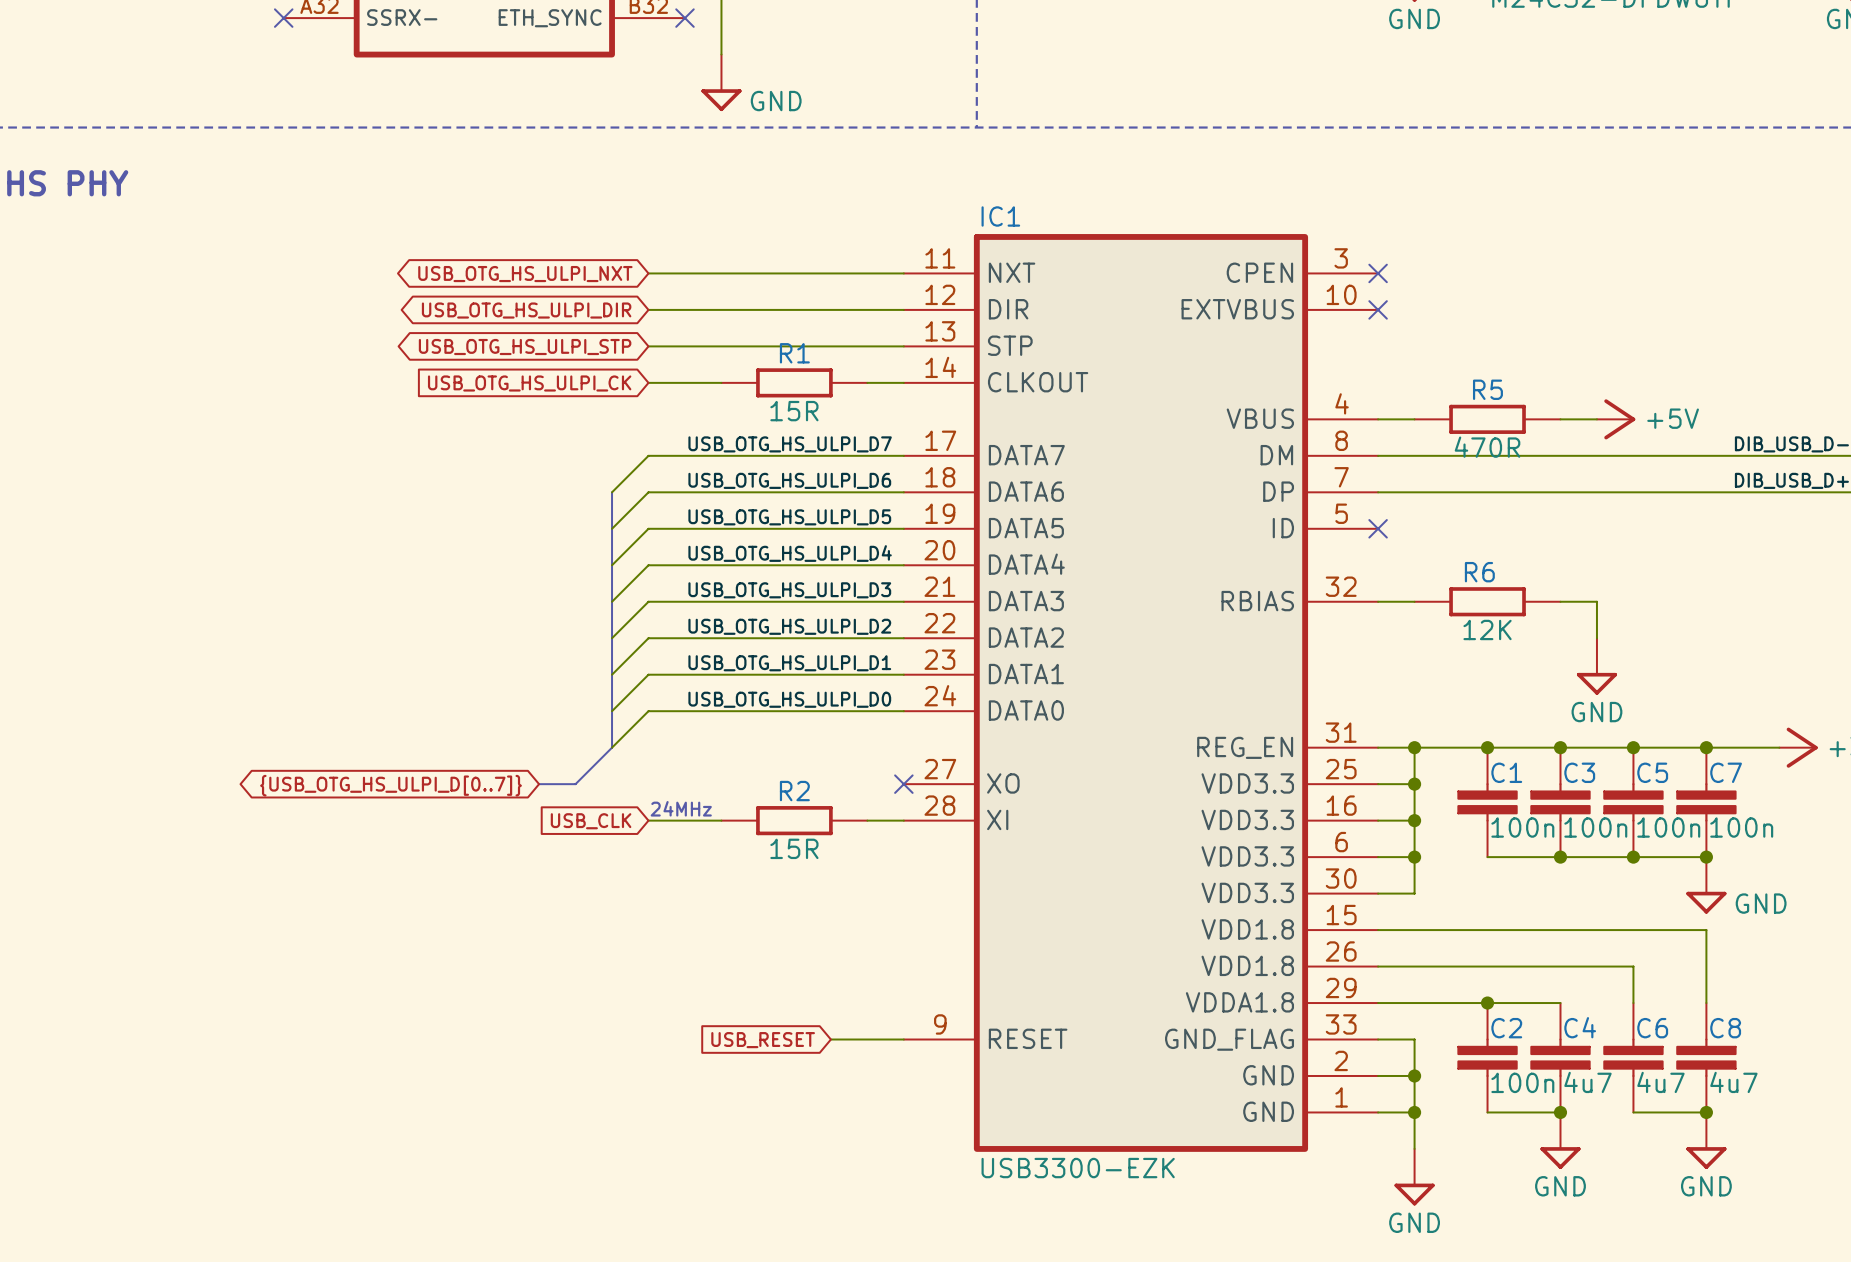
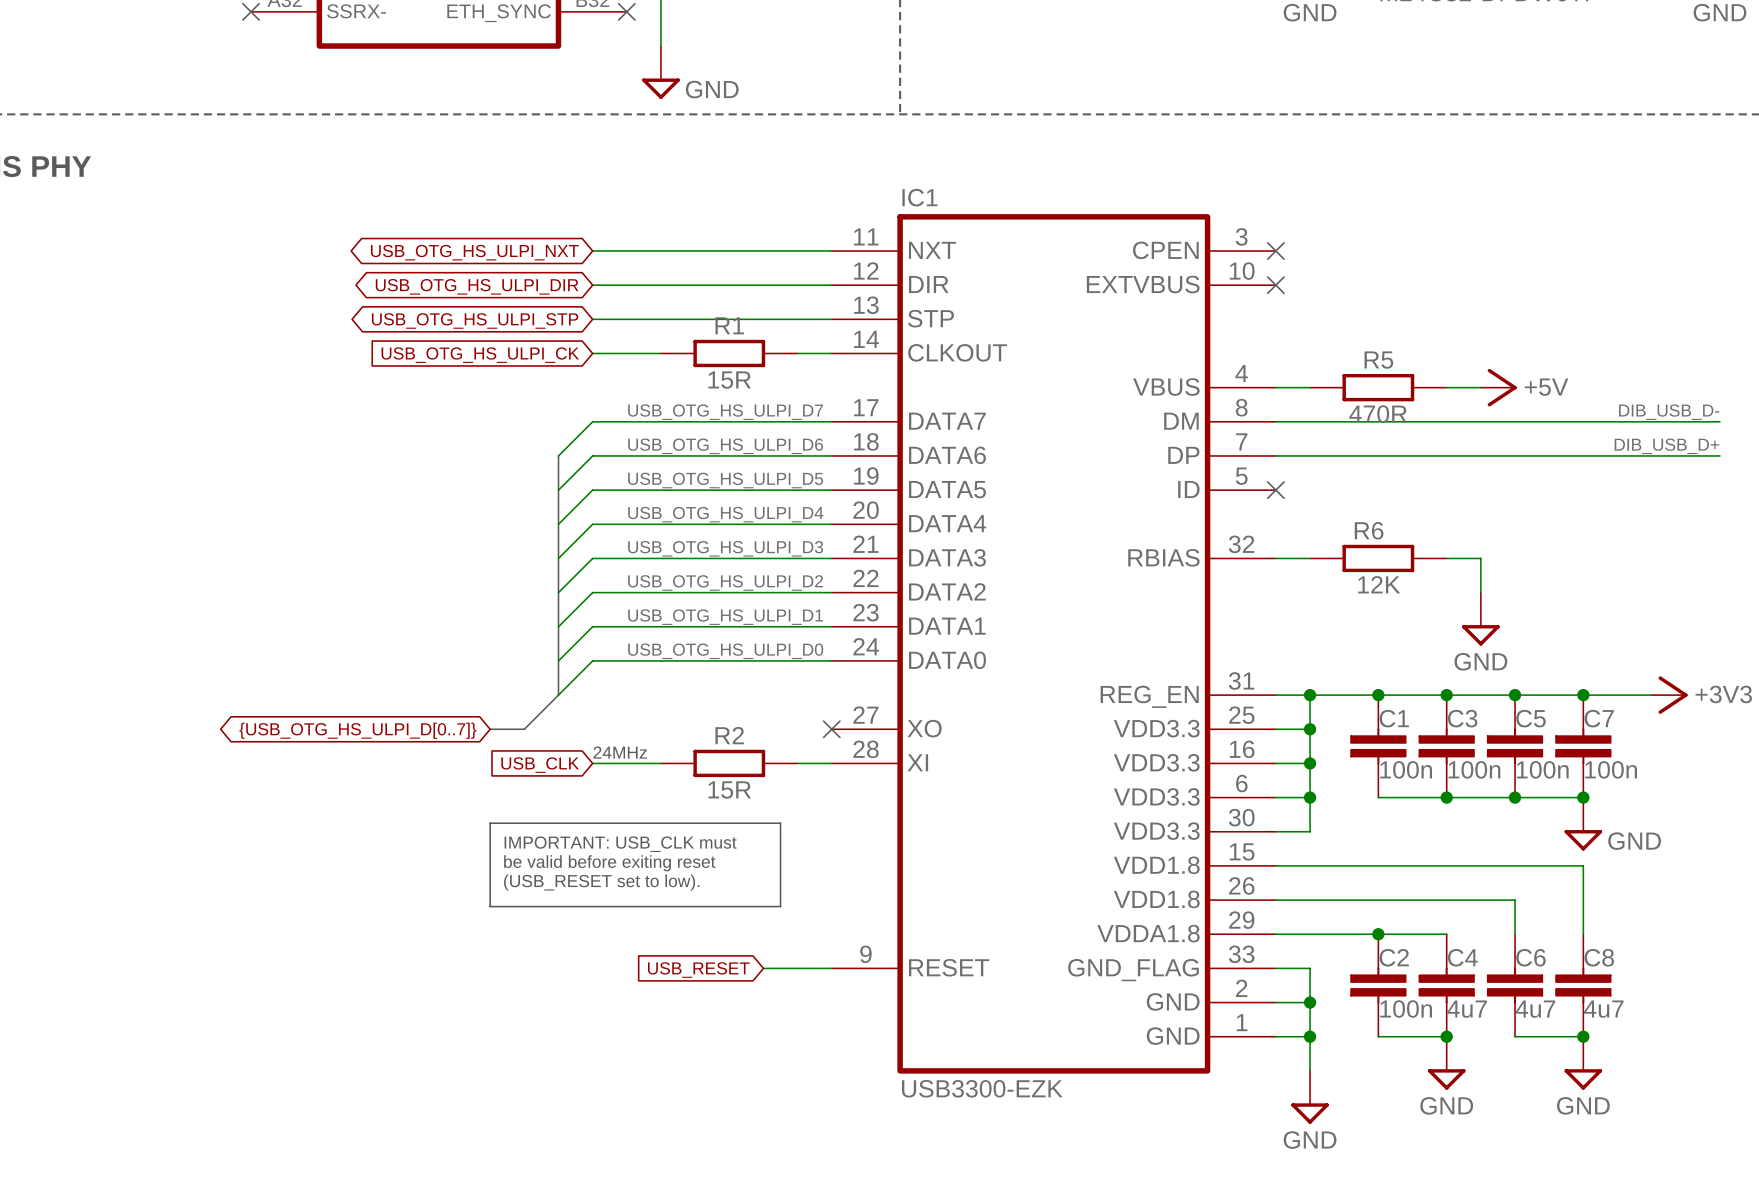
line: none -> (490, 823) (780, 823) (780, 906) (490, 906) (490, 823)
text: none -> IMPORTANT: USB_CLK must (620, 844)
text: none -> be valid before exiting reset (609, 863)
text: none -> (USB_RESET set to low). (601, 882)

